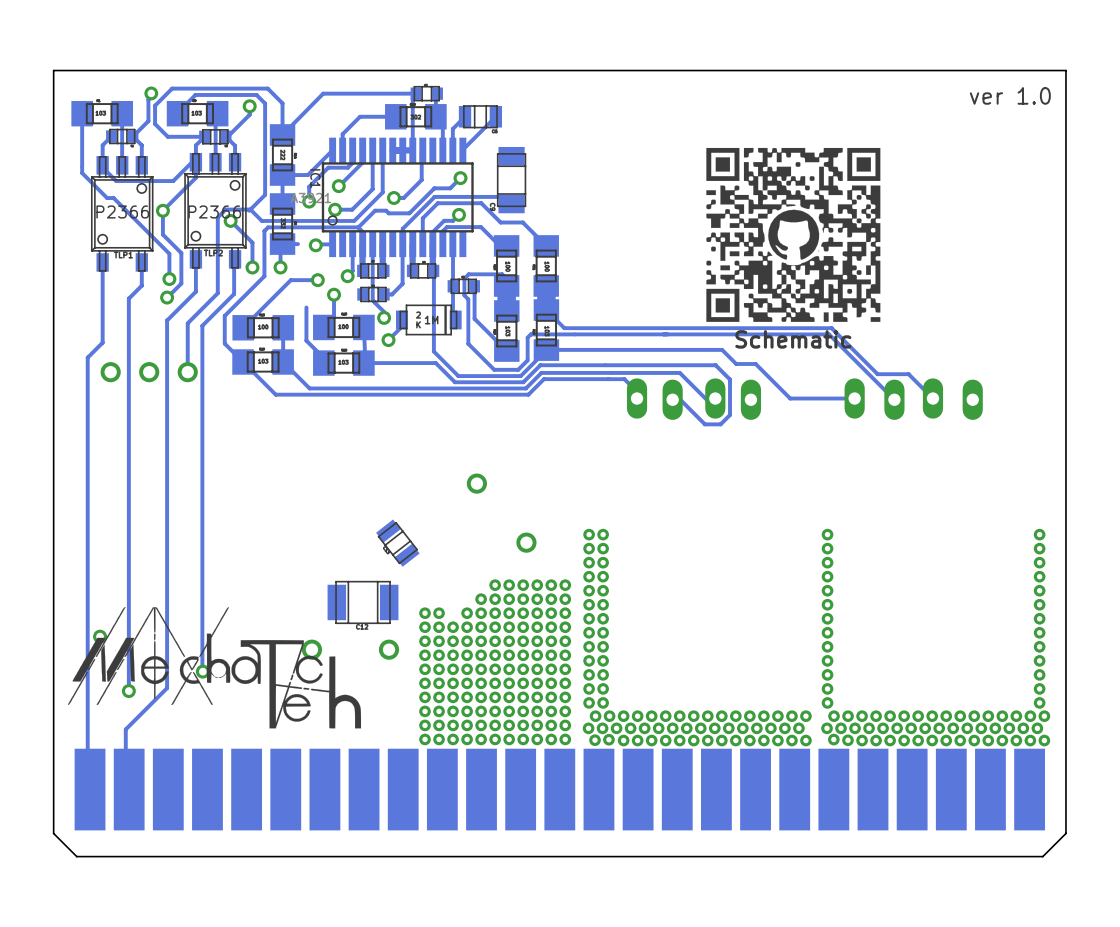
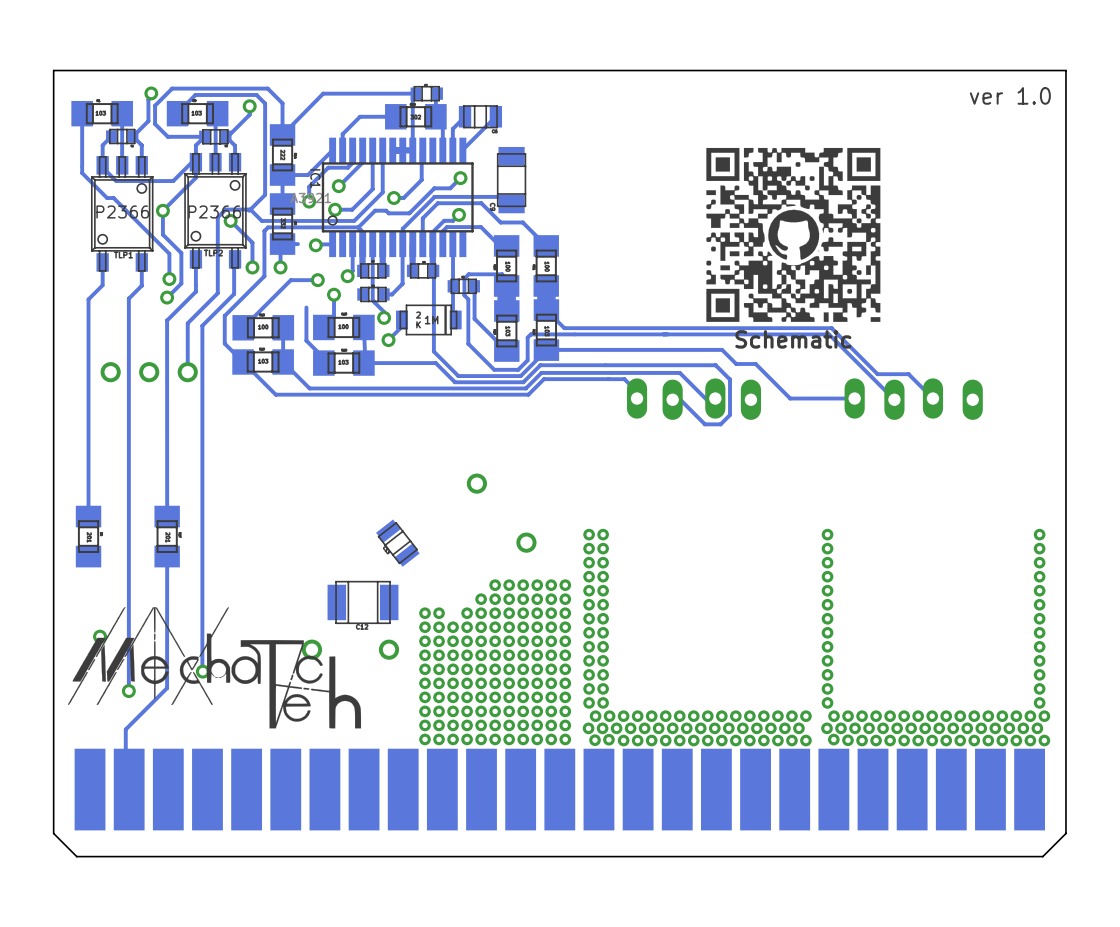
track: (102, 285) (102, 342) (87, 357) (87, 787) -> (102, 285) (88, 299) (88, 516)
track: (167, 320) (167, 688) -> (167, 320) (167, 516)
part: none -> (88, 536)
part: none -> (167, 536)

